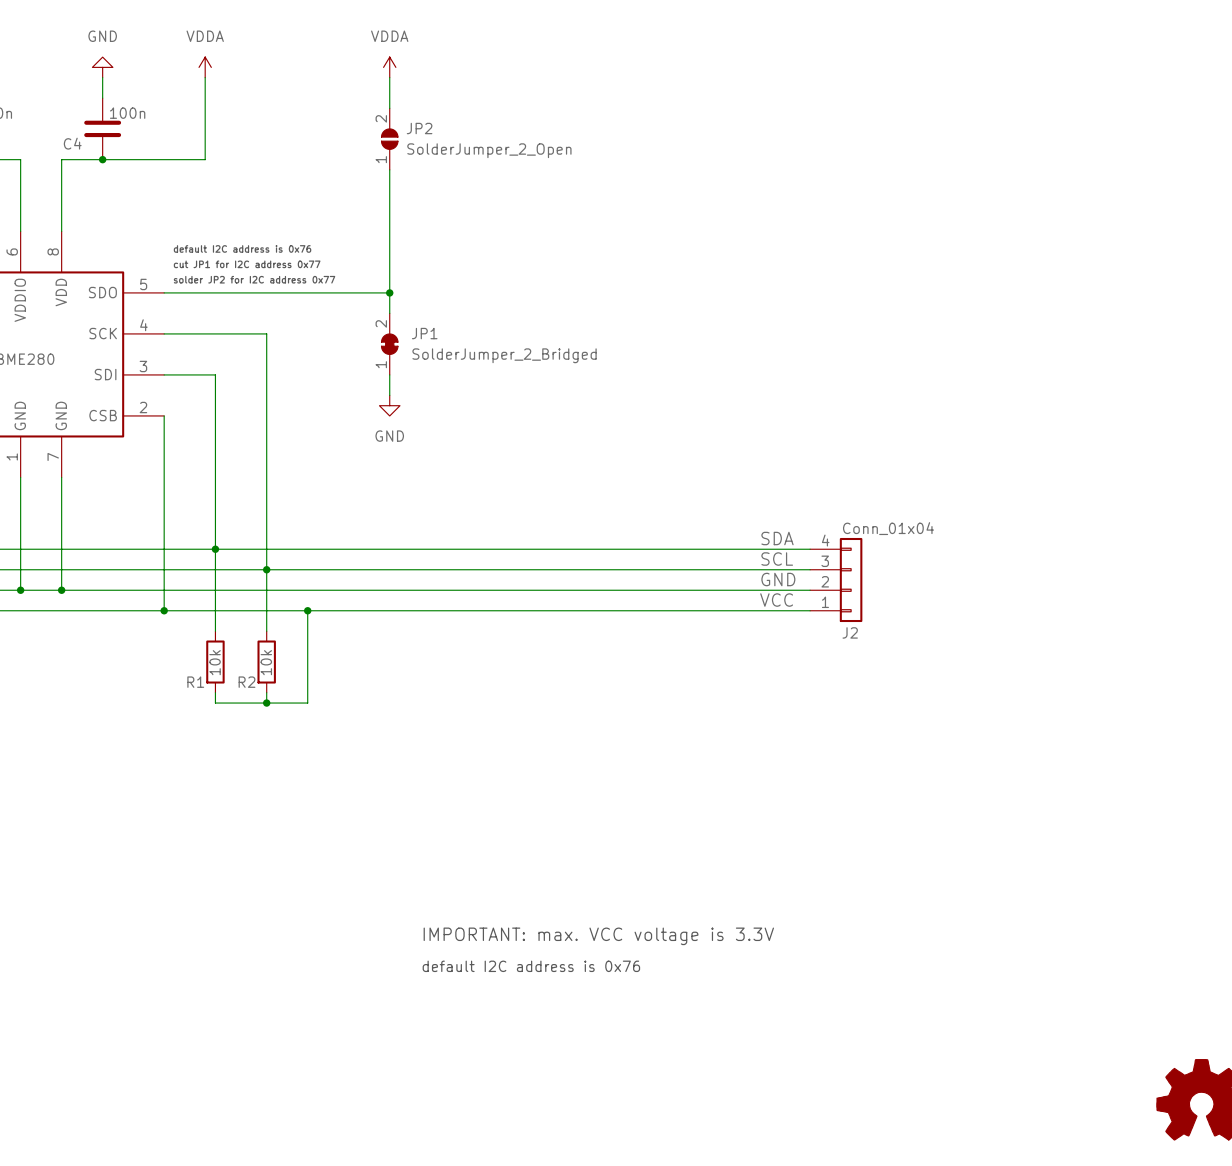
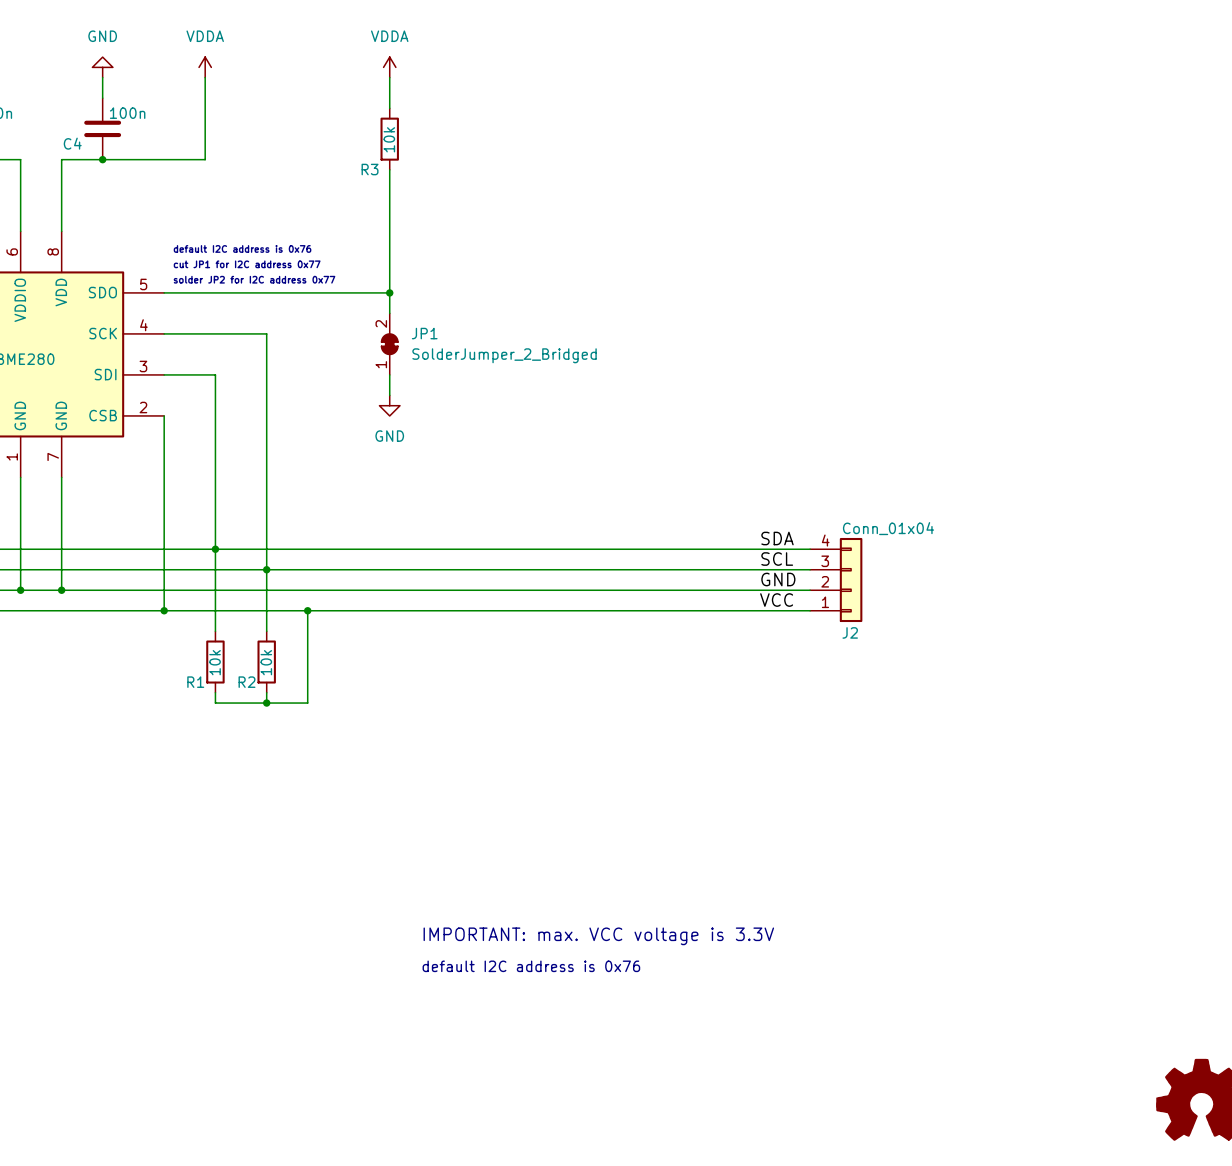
JP2: SolderJumper_2_Open (389, 139) -> none
R3: none -> 10k (389, 139)

